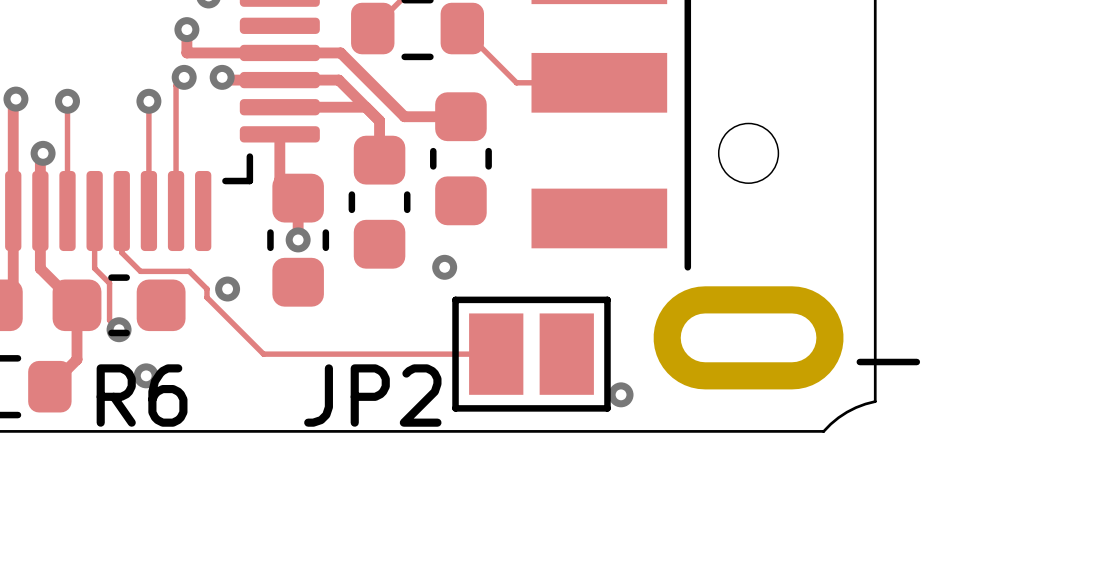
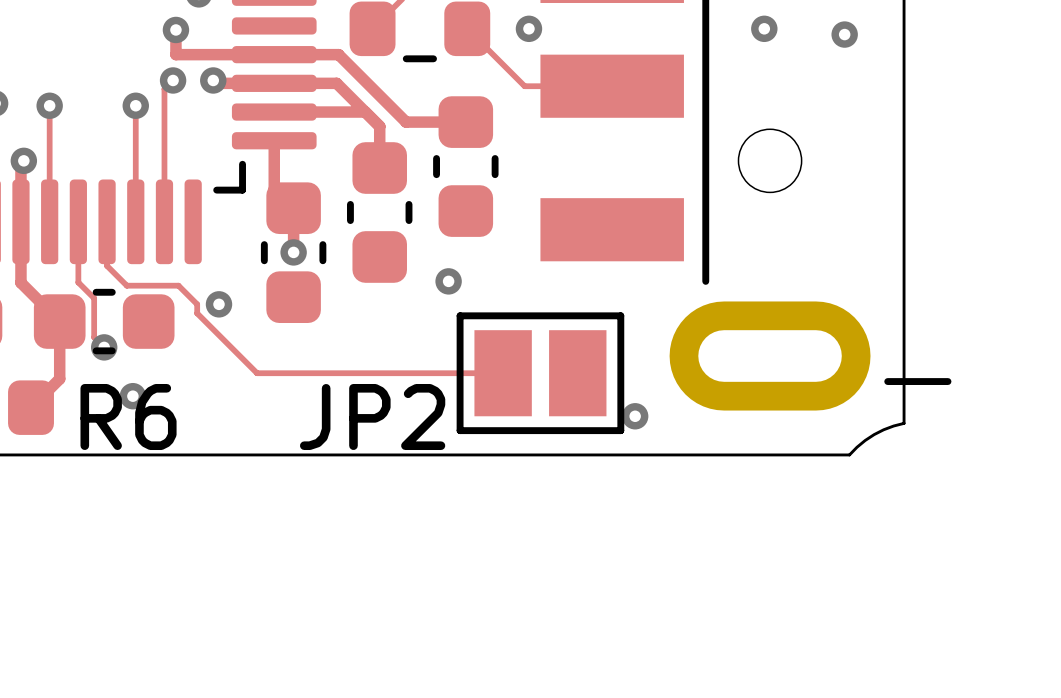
via: none -> (528, 28)
via: none -> (764, 28)
via: none -> (844, 34)

